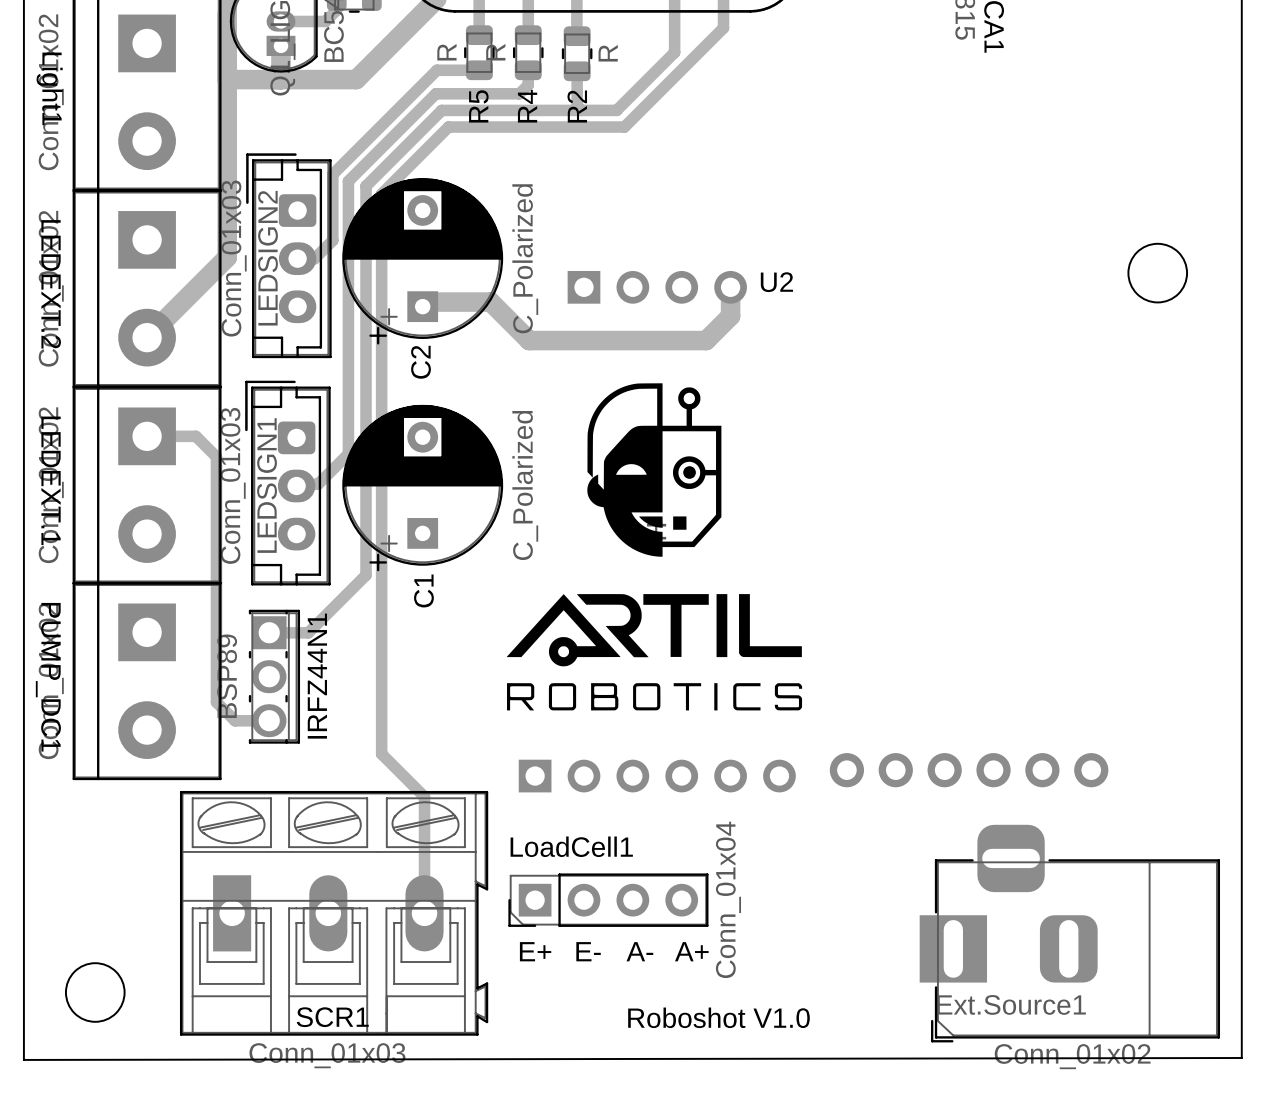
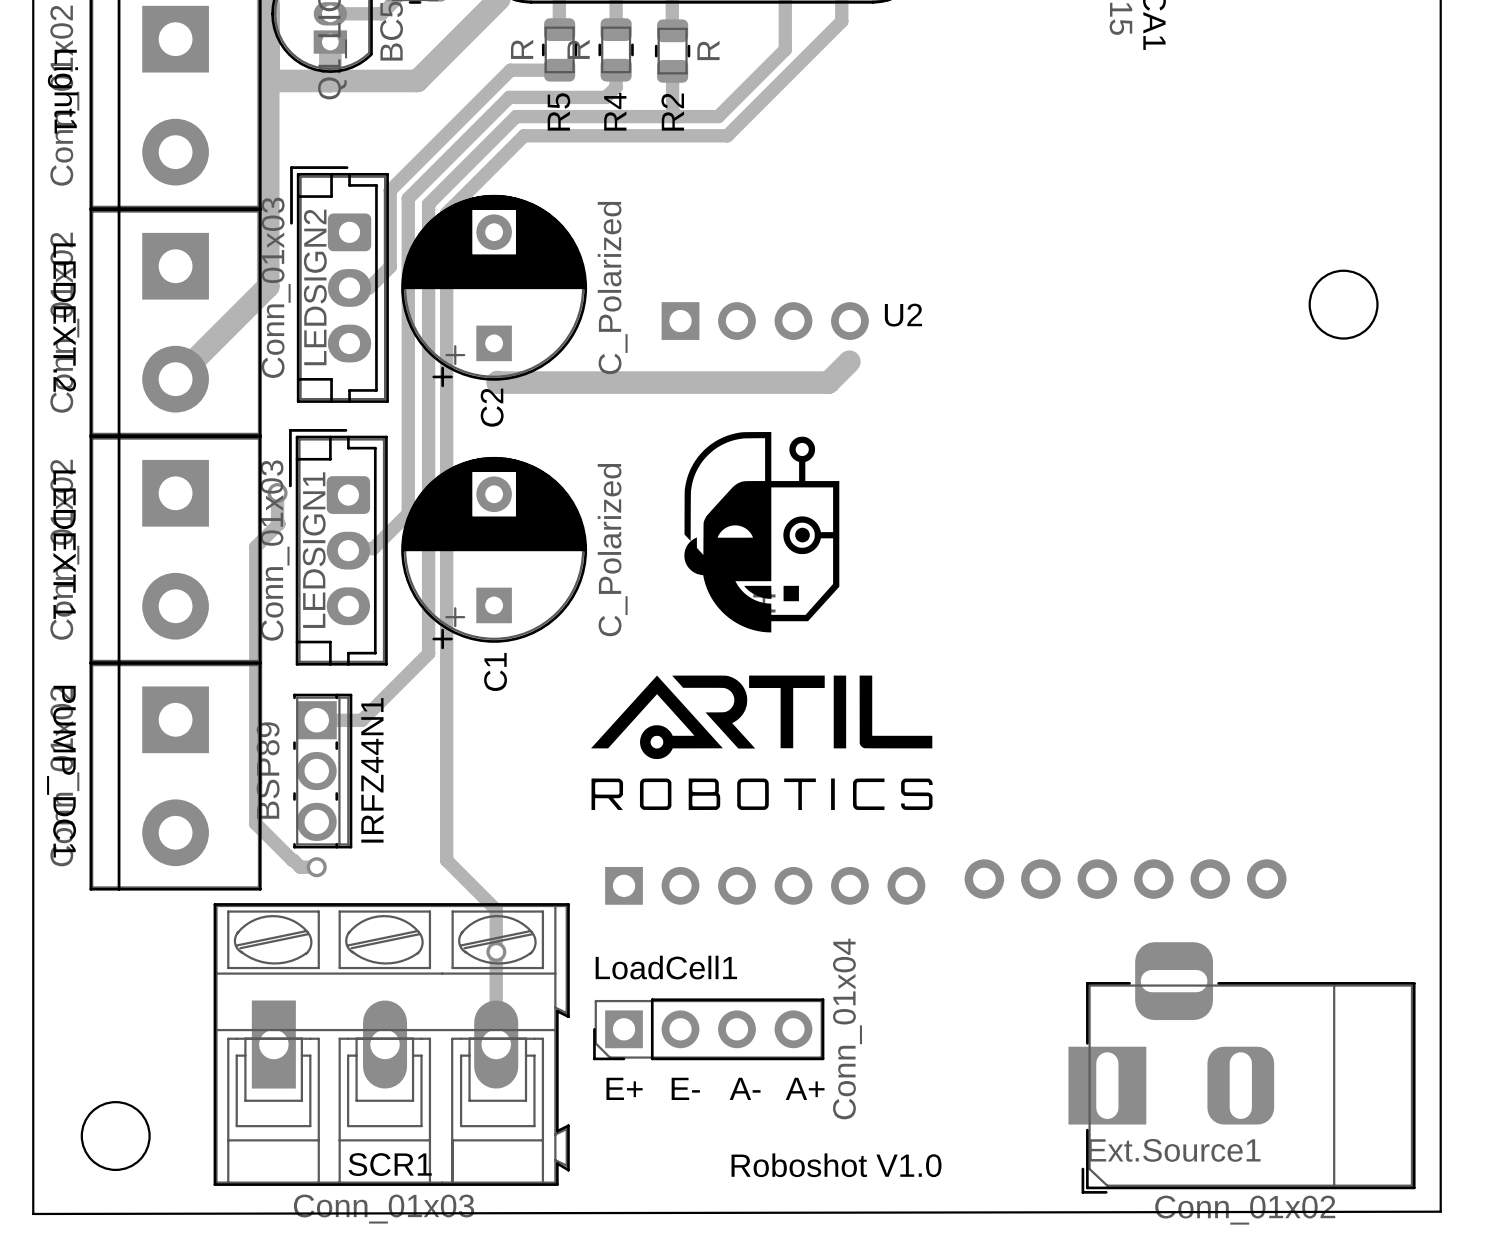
track: (730, 287) (730, 316) (706, 340) -> (849, 361) (828, 382) (821, 382)
track: (422, 302) (490, 302) (529, 340) -> (497, 382) (617, 382)
track: (147, 436) (195, 436) (216, 456) (216, 482) -> (277, 493) (278, 523) (255, 546)
via: none -> (277, 493)
track: (216, 702) (235, 720) (265, 720) -> (255, 800) (255, 823) (300, 867) (316, 867)
via: none -> (316, 867)
via: none -> (496, 951)

